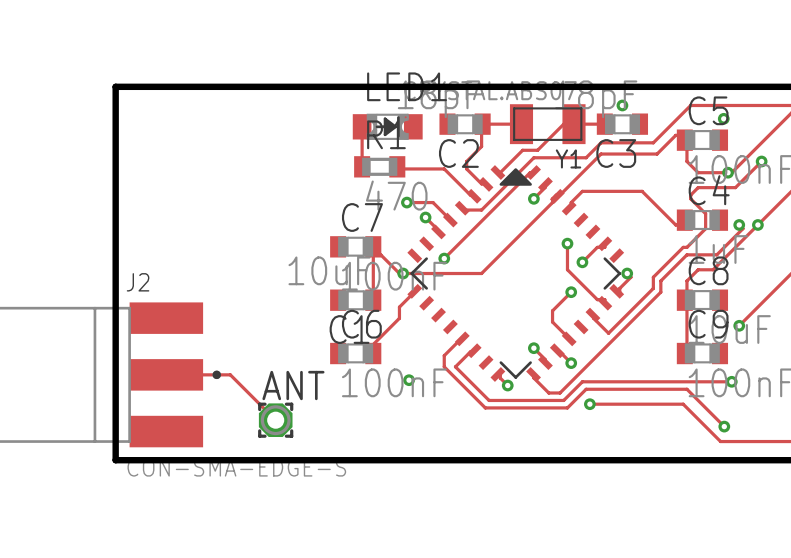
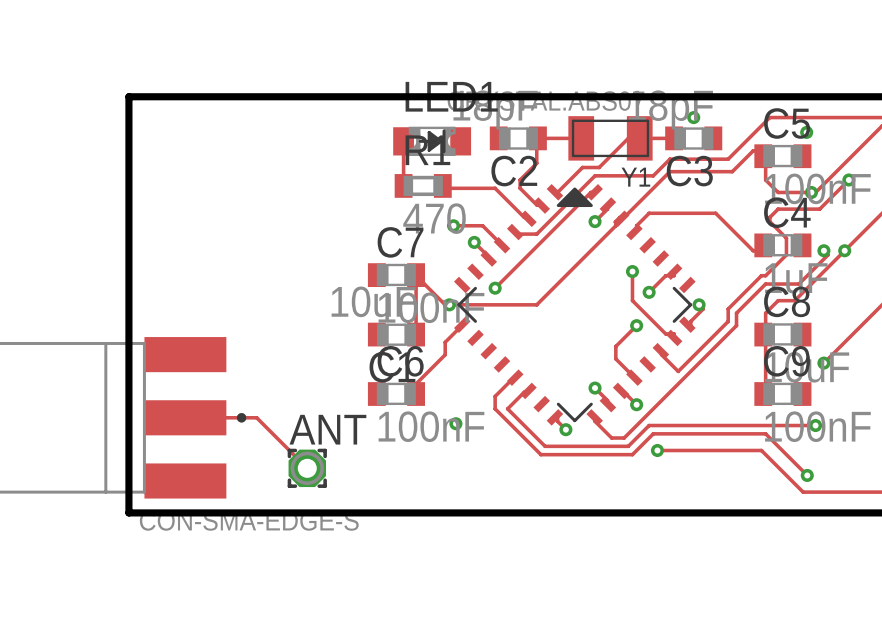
J2 name: J2 (138, 282) -> none

